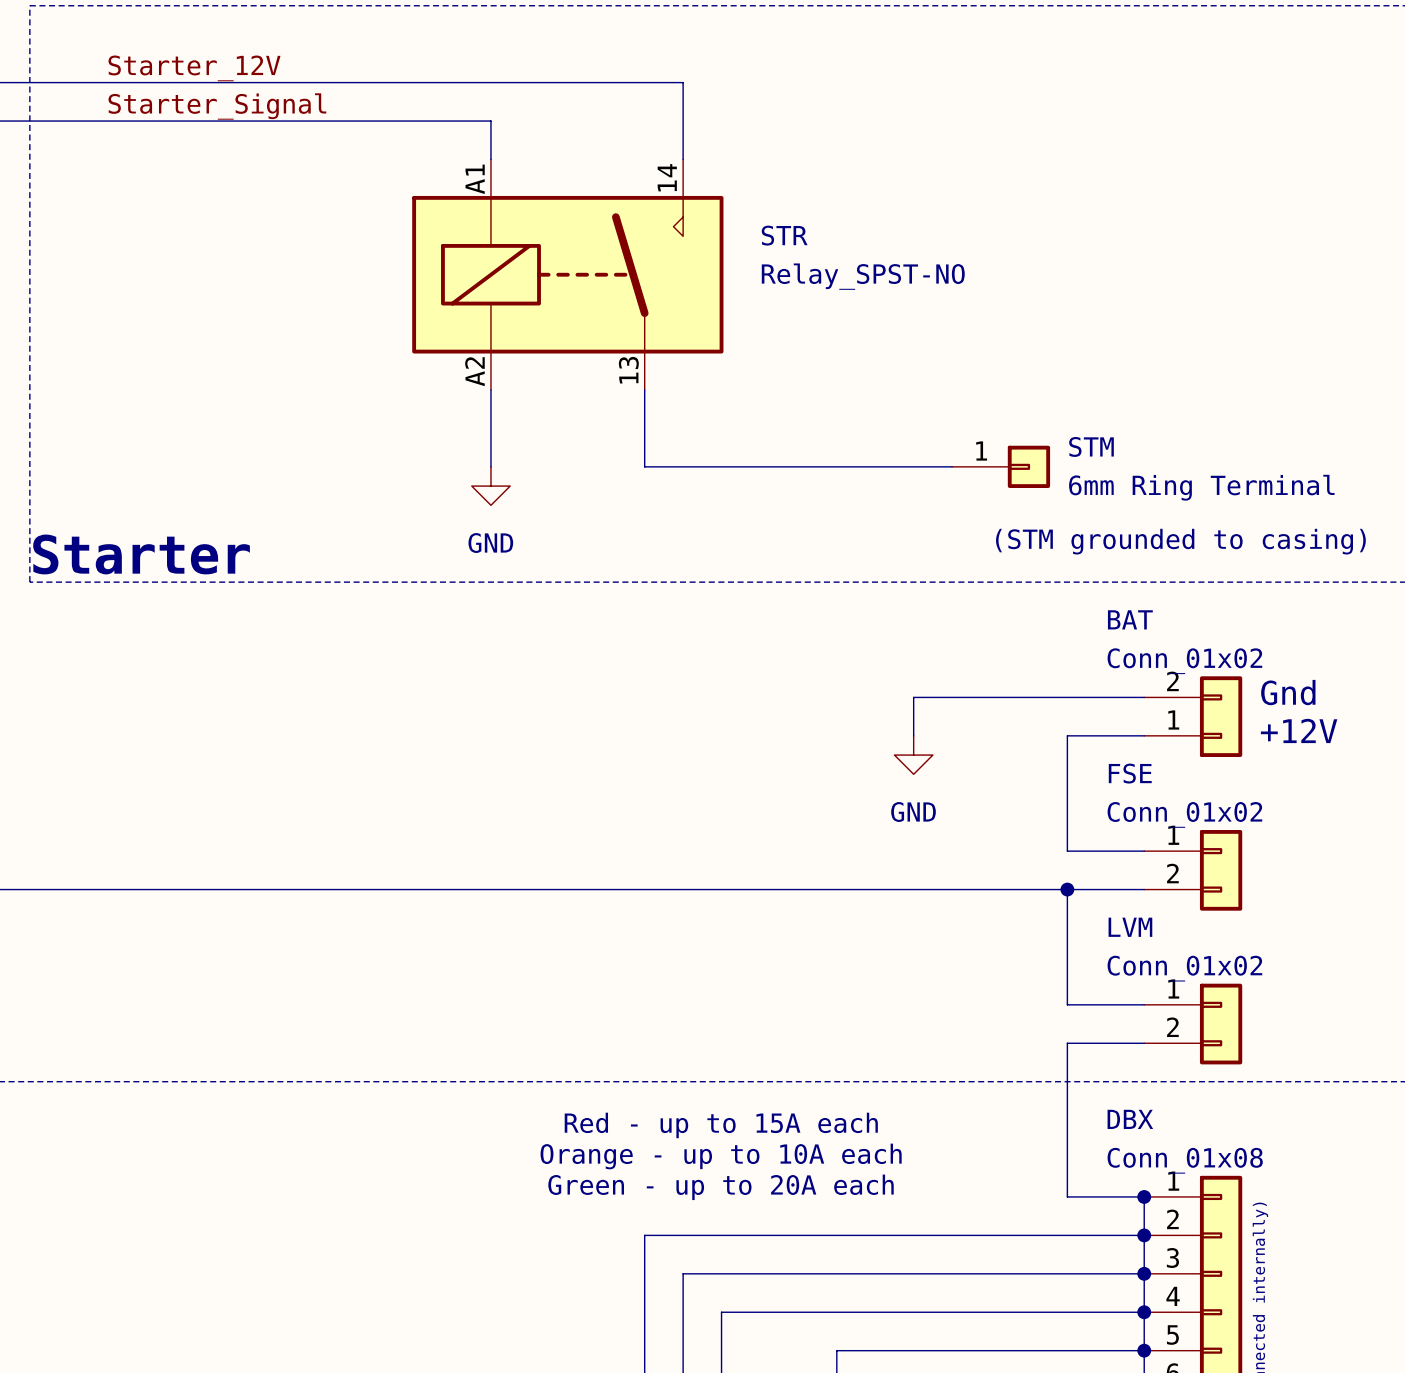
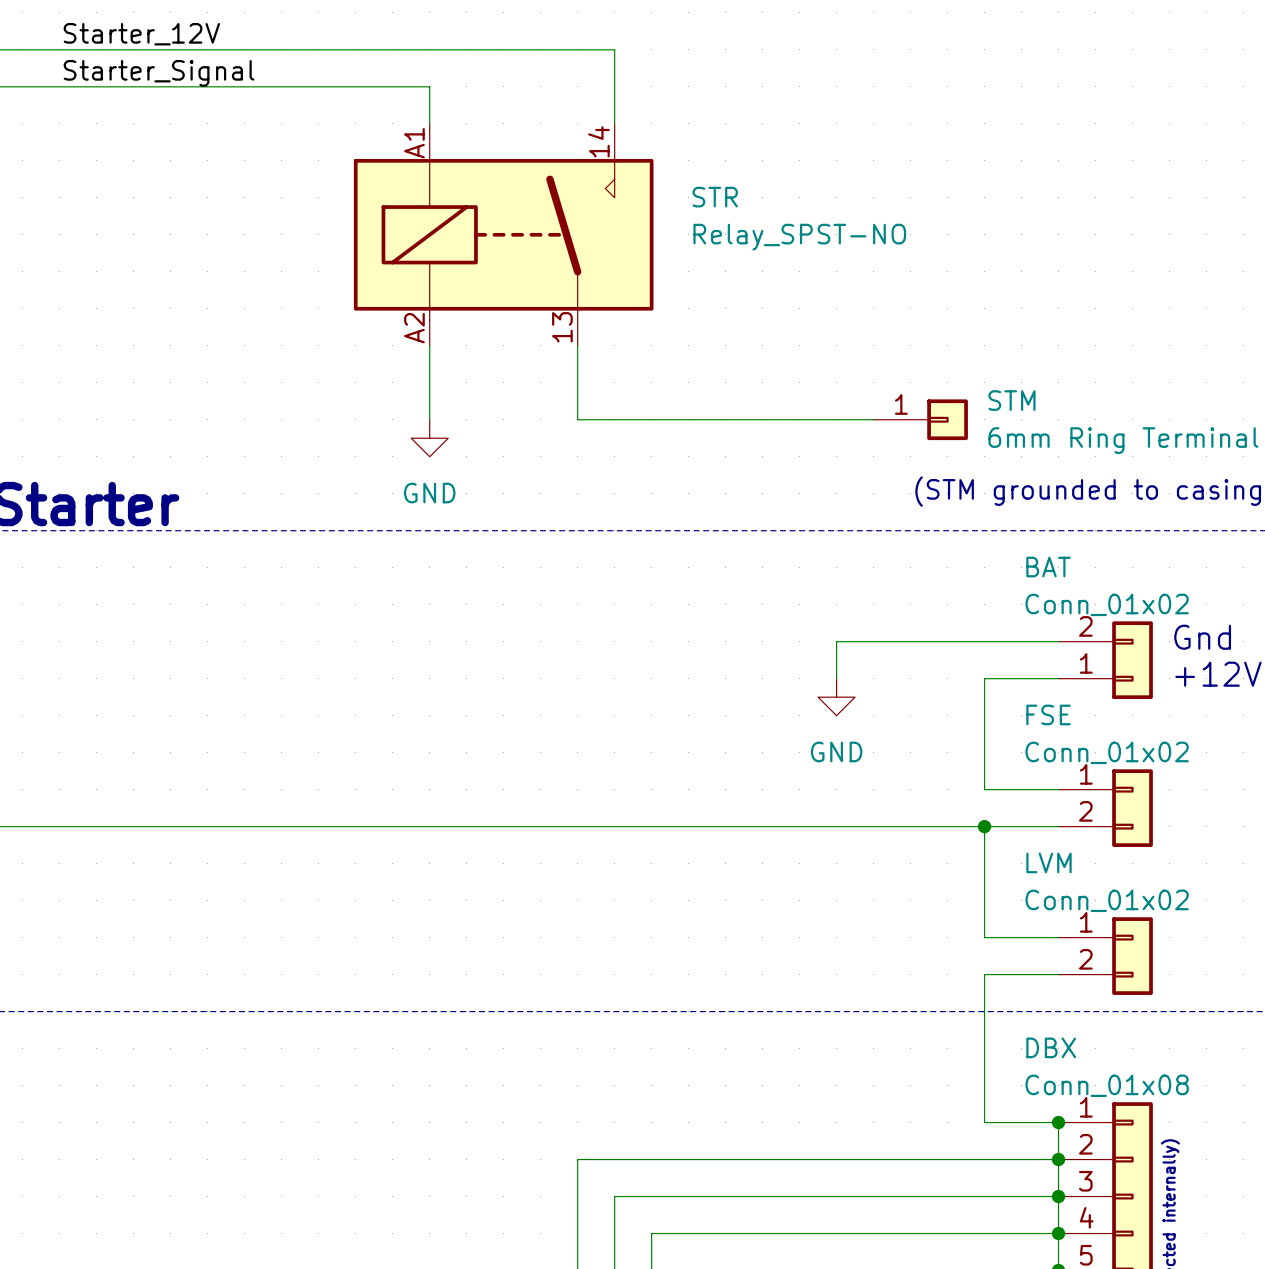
text: Red - up to 15A each (721, 1125) -> none
text: Orange - up to 10A each (721, 1156) -> none
text: Green - up to 20A each (721, 1187) -> none

